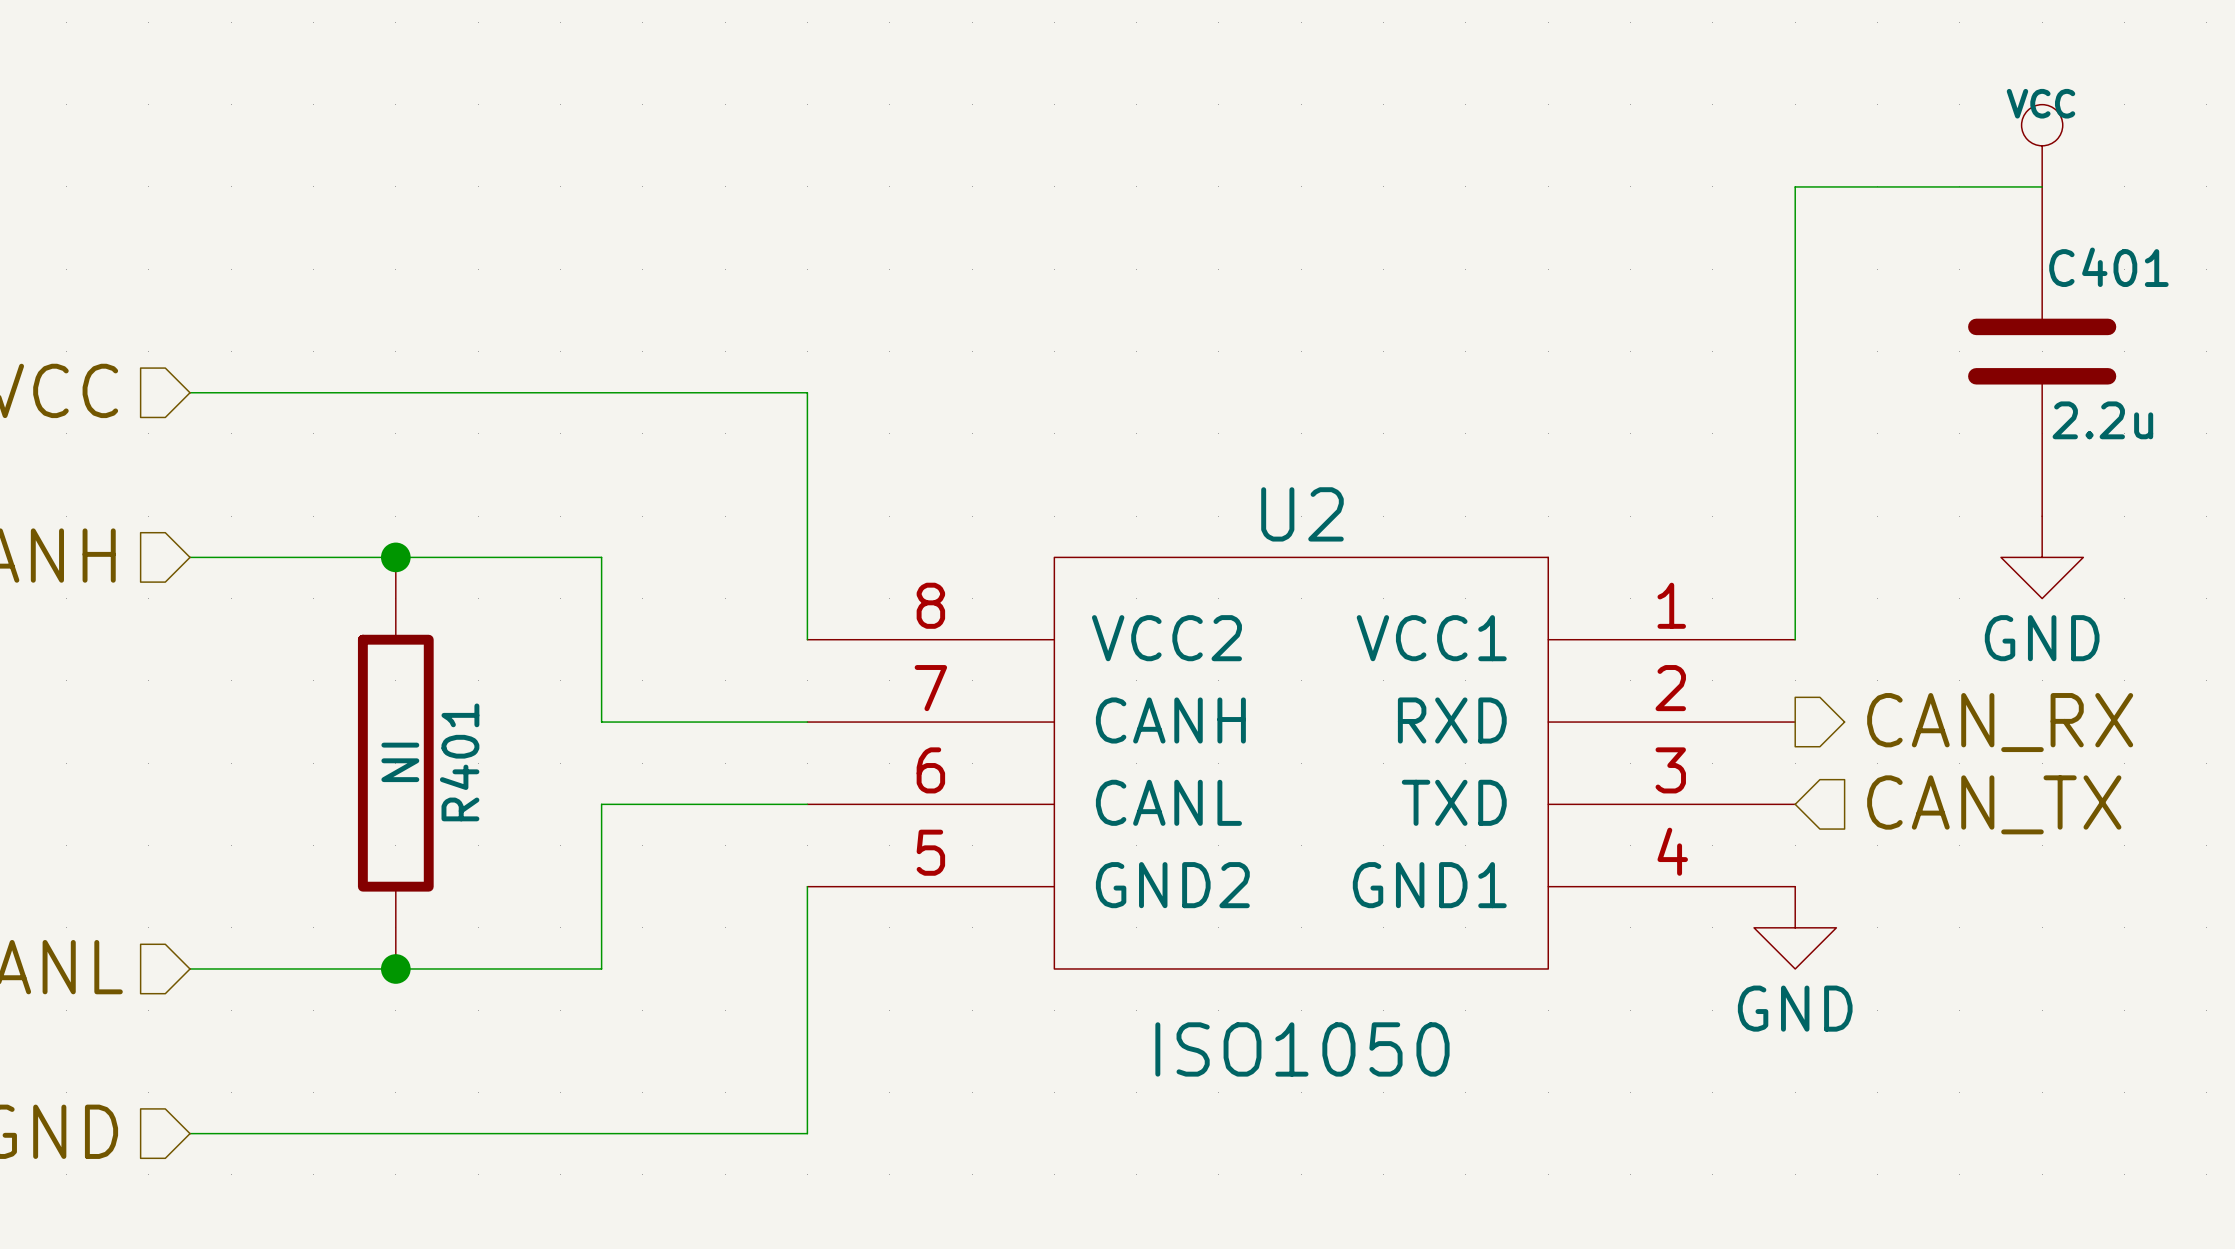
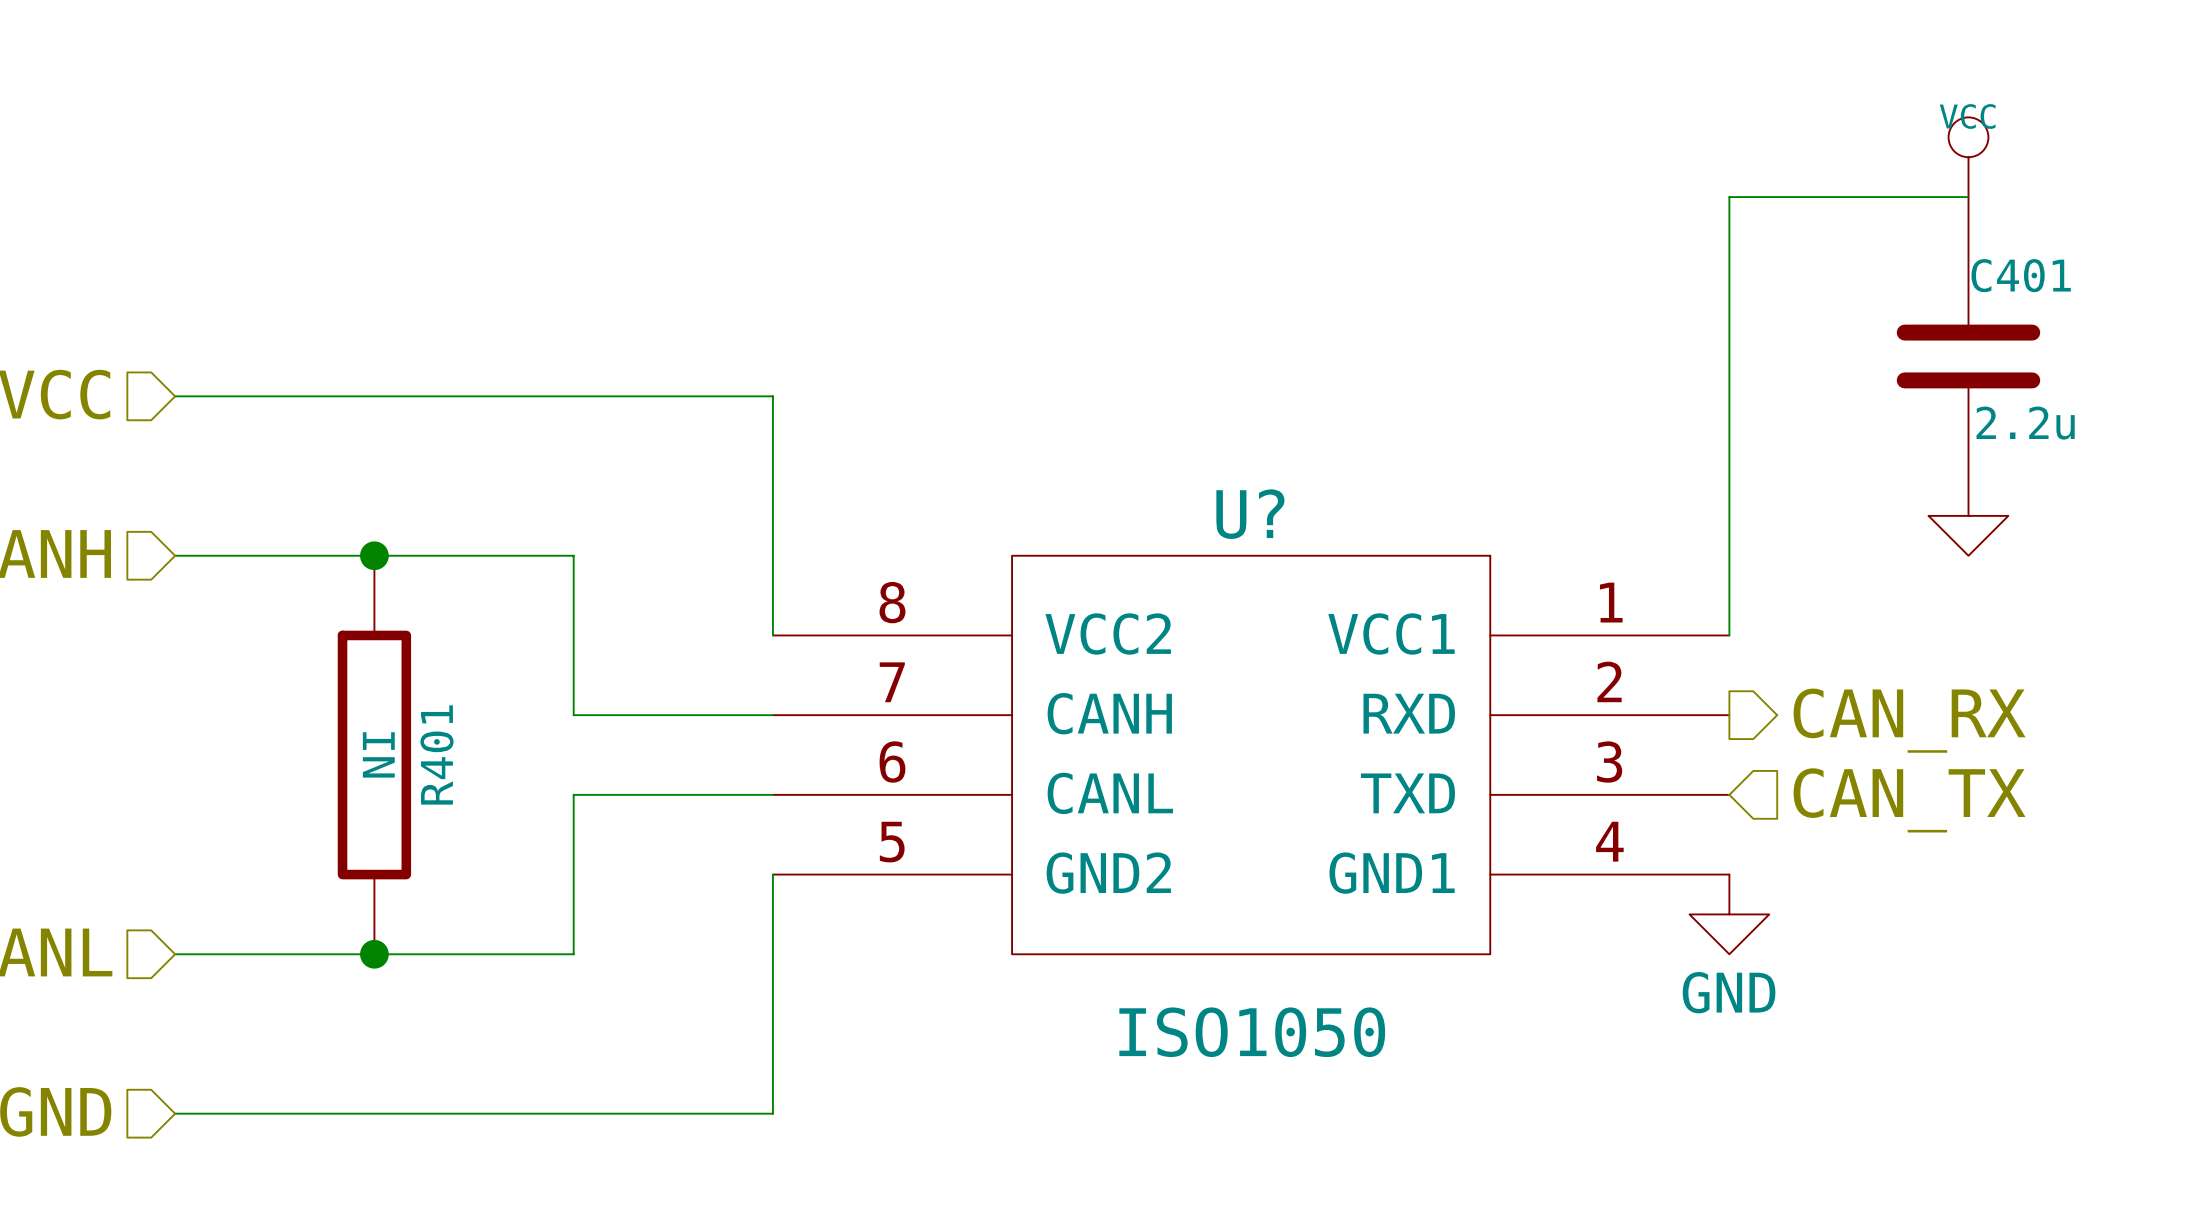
U2 name: U2 (1302, 514) -> U? (1250, 514)
power symbol shape: [2001, 516, 2084, 599] -> [1928, 515, 2009, 556]
power symbol text: GND (2042, 638) -> none

